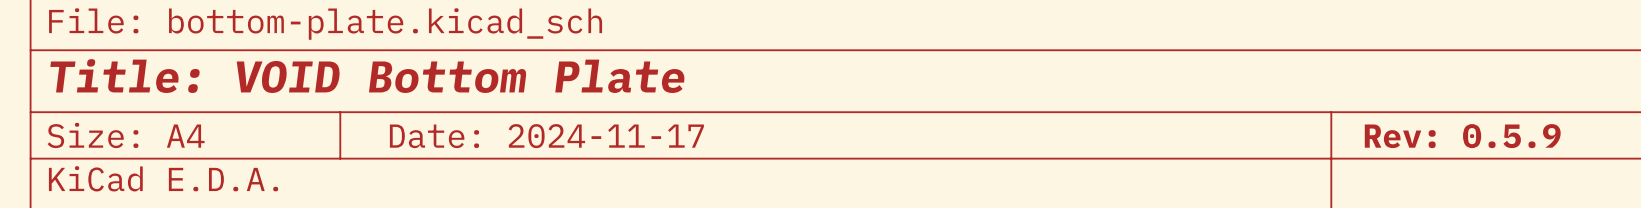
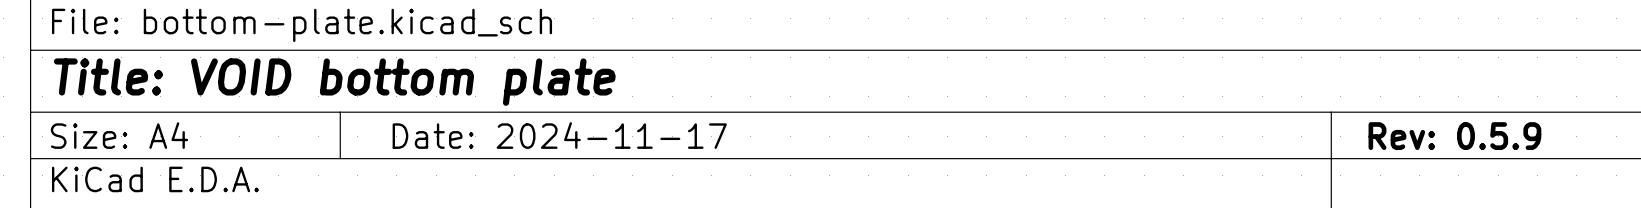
title block: Title: VOID Bottom Plate (367, 76) -> Title: VOID bottom plate (334, 82)

